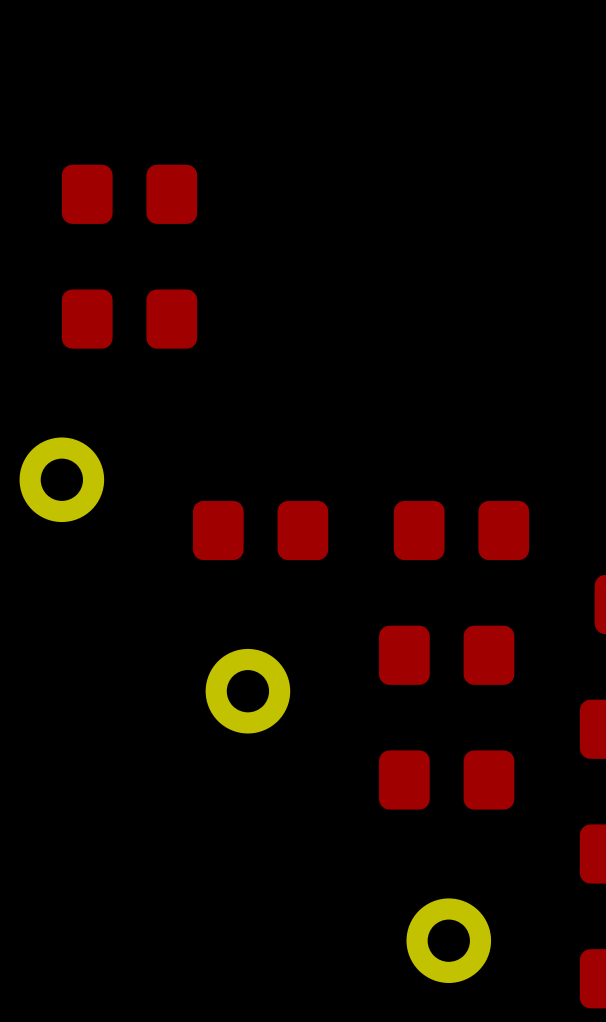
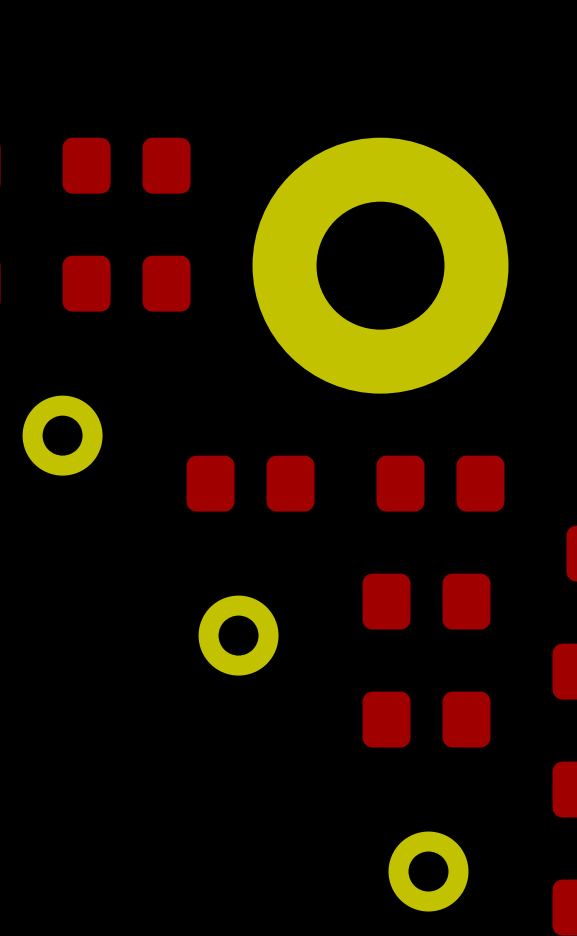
part: none -> (380, 265)

